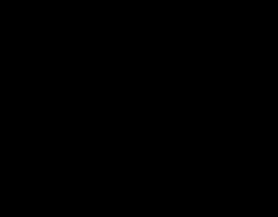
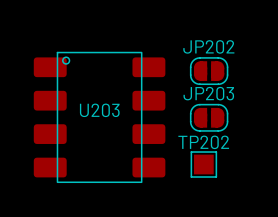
JP202: none -> (209, 71)
U203: none -> (99, 117)
JP203: none -> (209, 117)
TP202: none -> (203, 164)

